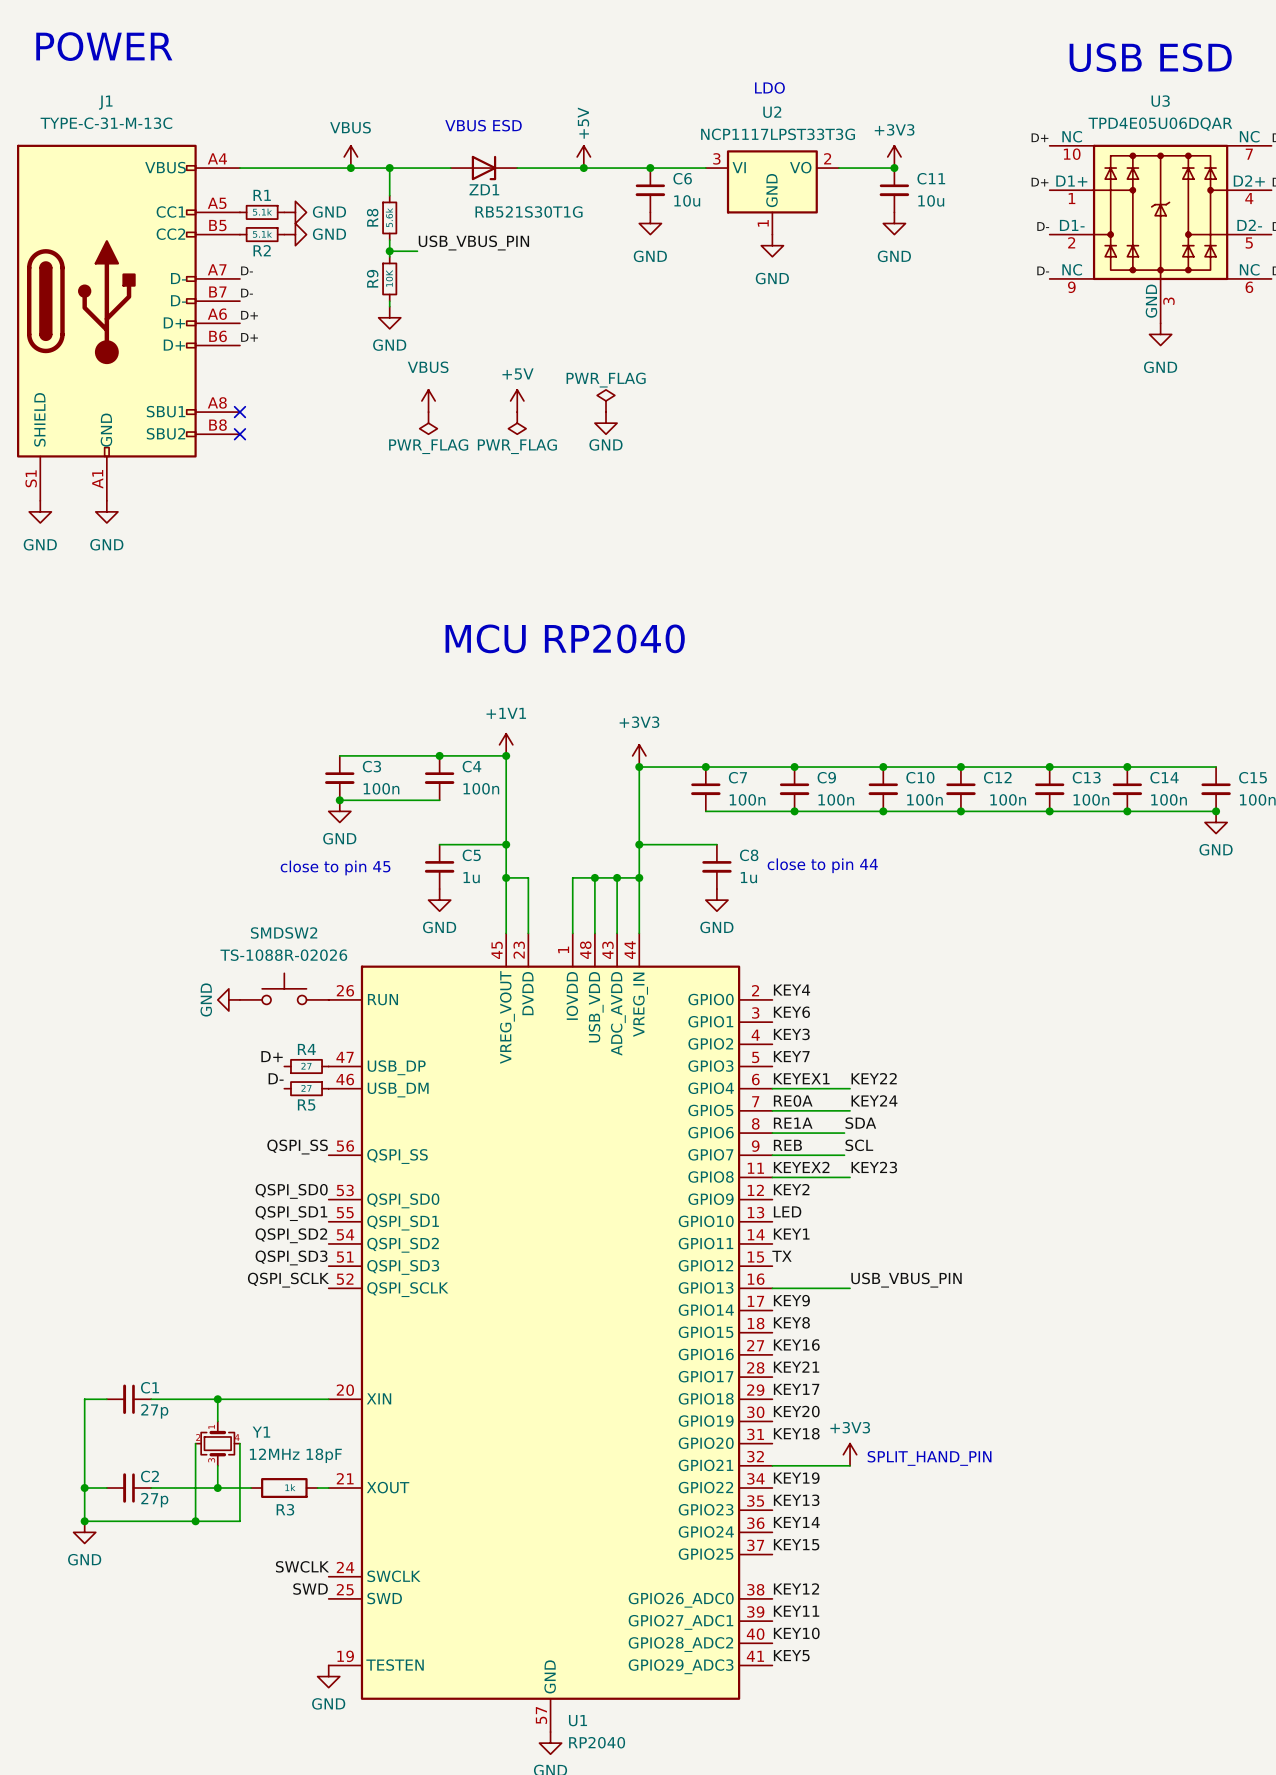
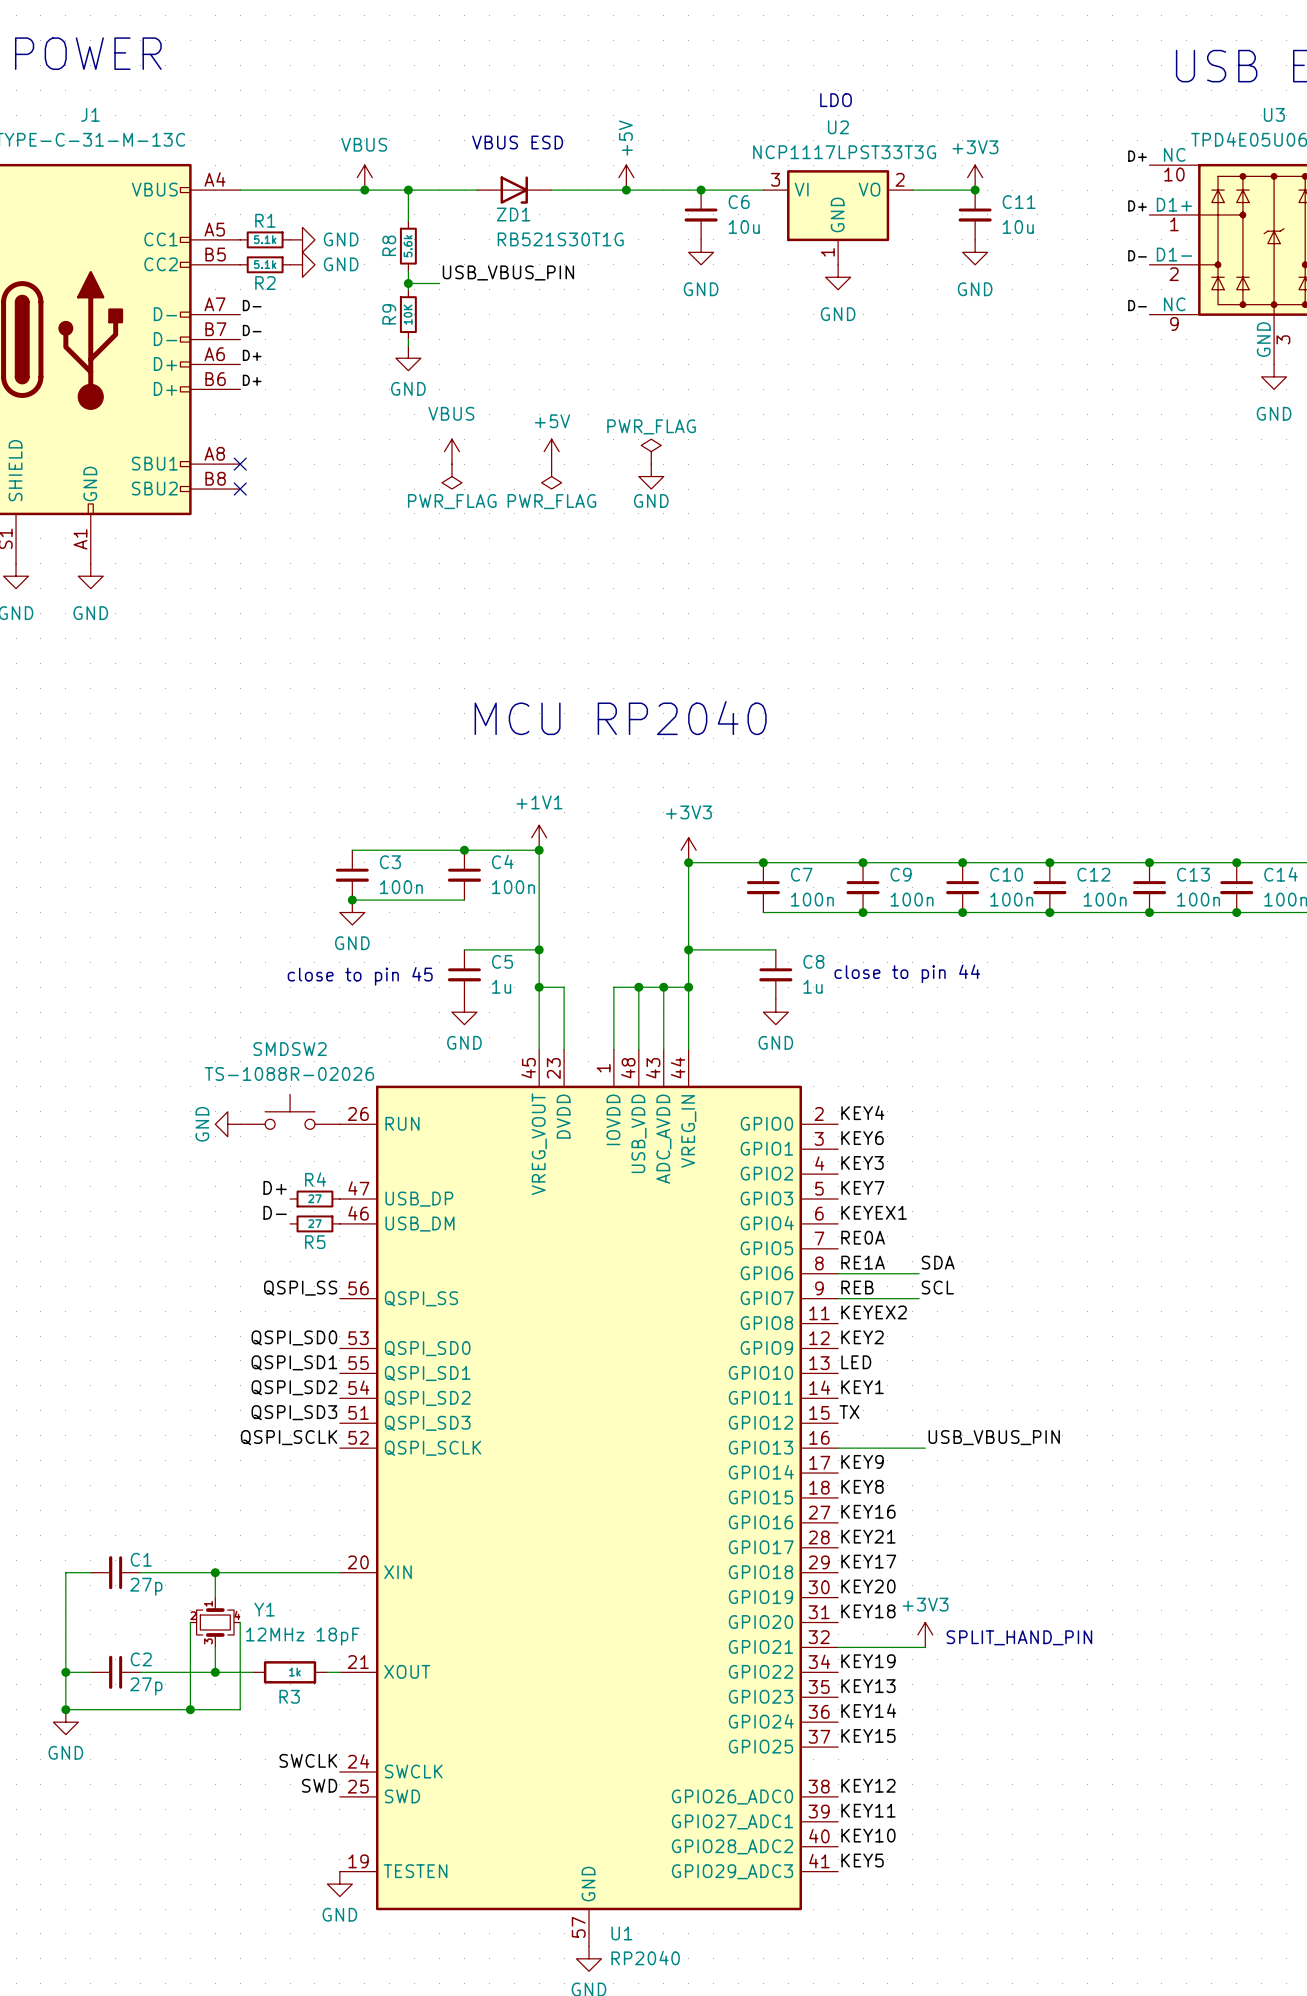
label: KEY22 (874, 1078) -> none
wire: (772, 1088) (850, 1088) -> none
label: KEY24 (874, 1100) -> none
wire: (772, 1110) (850, 1110) -> none
label: KEY23 (874, 1167) -> none
wire: (772, 1177) (850, 1177) -> none

